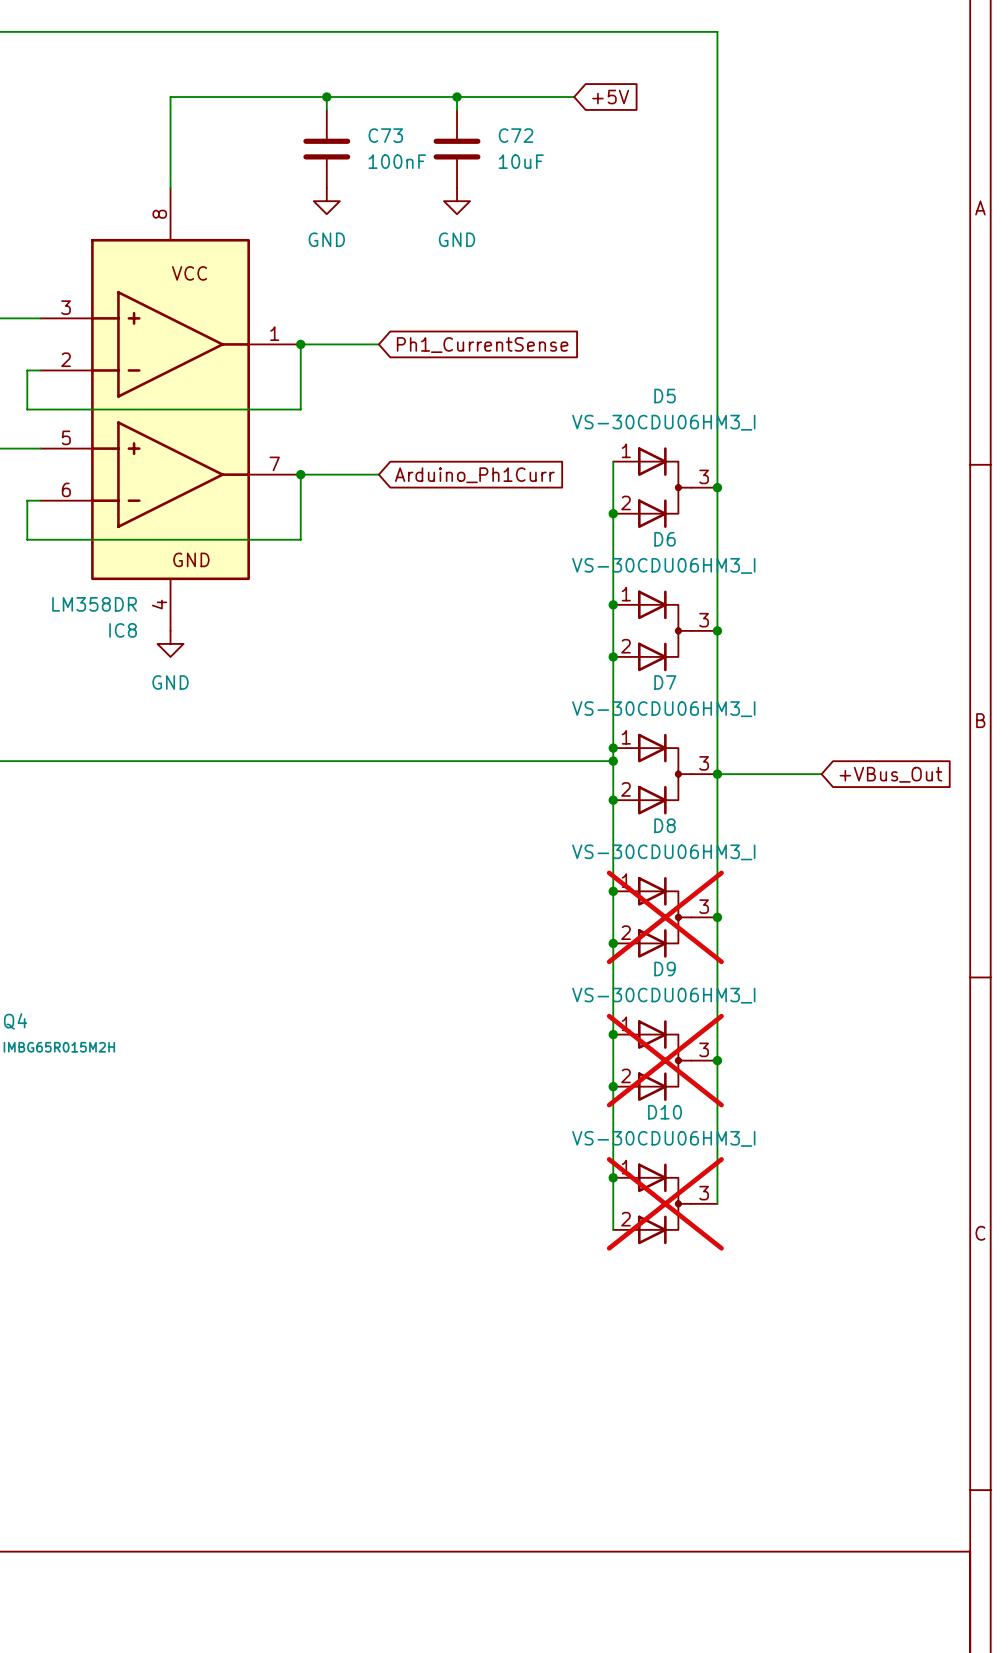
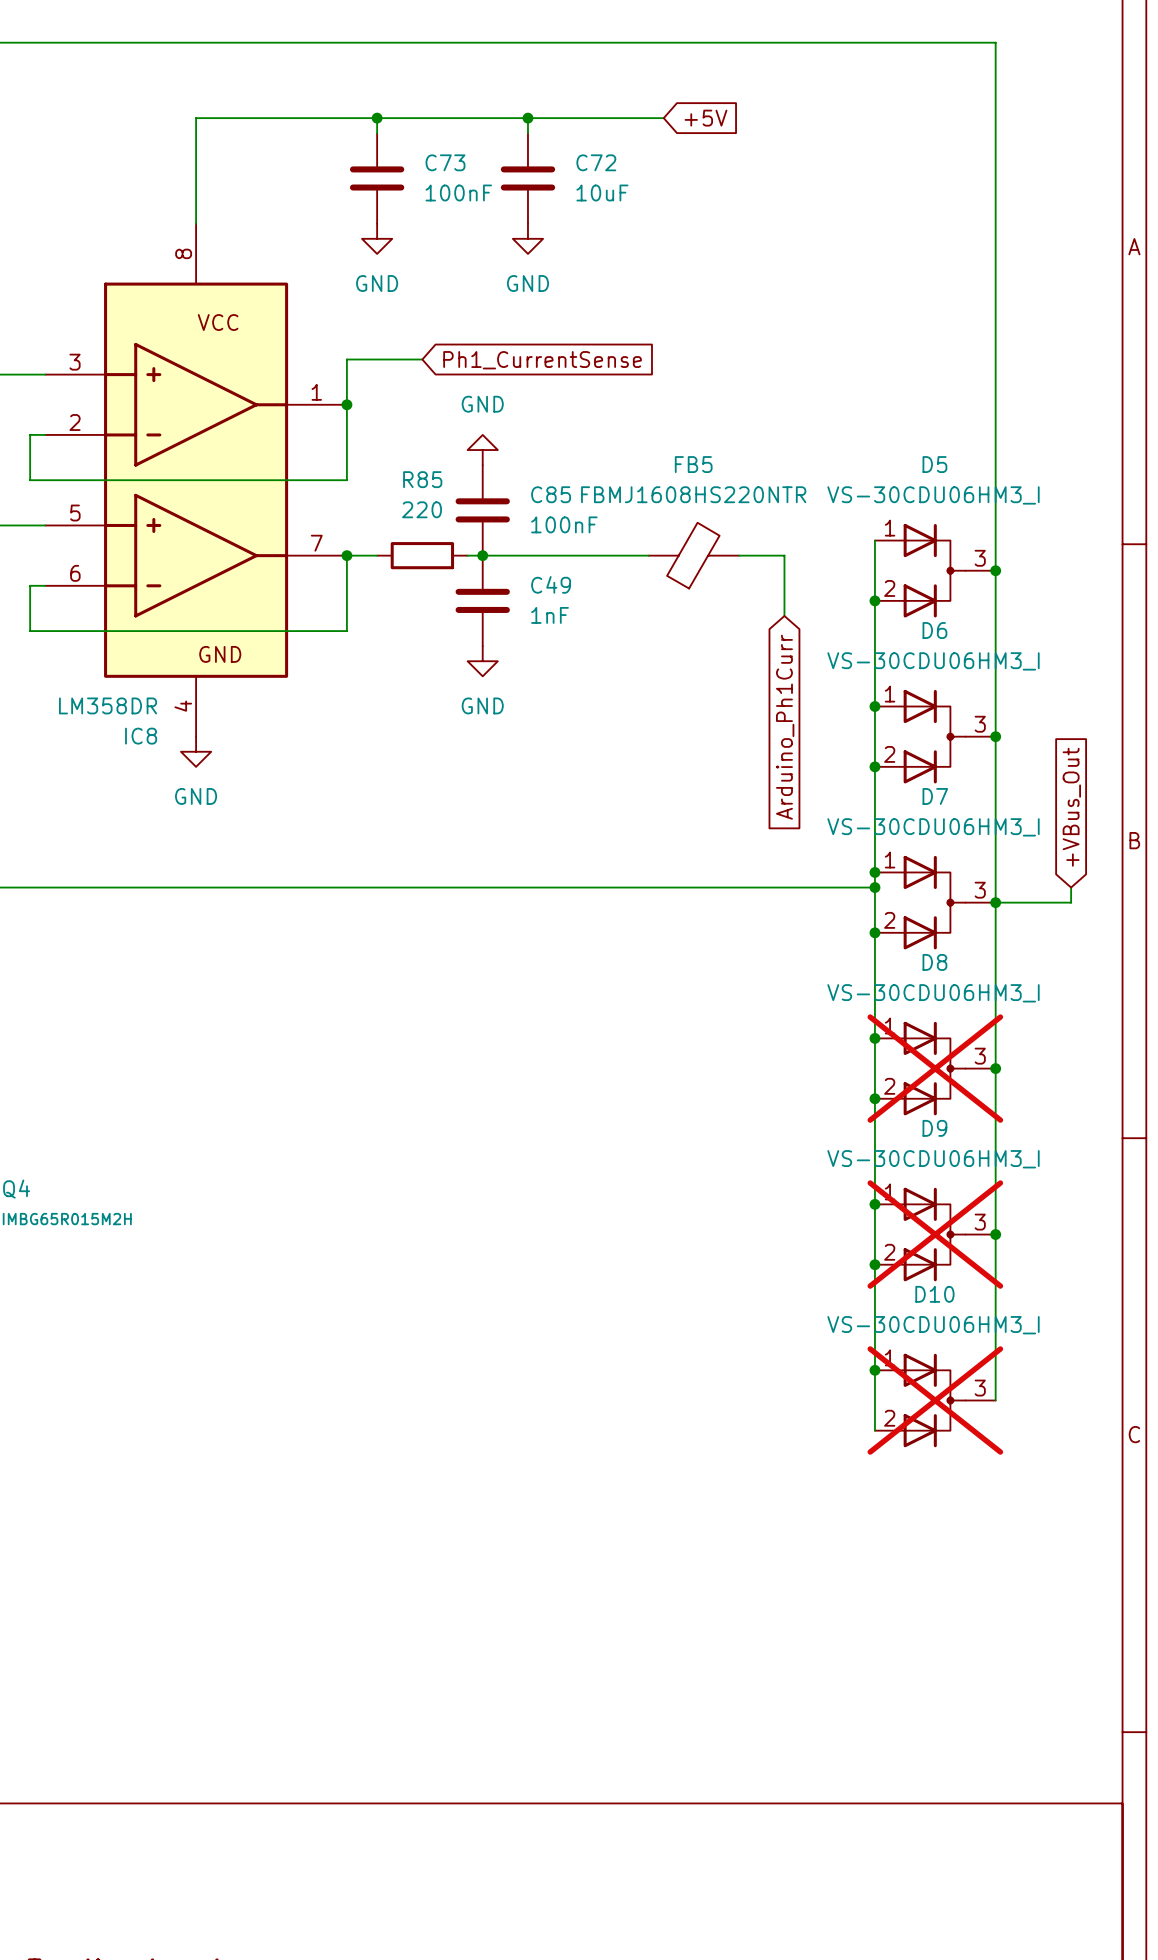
wire: (717, 31) (717, 1203) -> (829, 42) (995, 42) (995, 1400)
wire: (300, 344) (378, 344) -> (346, 404) (346, 359) (422, 359)
global label position: Ph1_CurrentSense (482, 345) -> Ph1_CurrentSense (542, 360)
power symbol: none -> GND (482, 450)
C85: none -> 100nF (482, 510)
wire: (613, 461) (613, 1229) -> (874, 540) (874, 1430)
wire: (326, 474) (378, 474) -> none
R85: none -> 220 (422, 555)
wire: none -> (467, 555) (648, 555)
junction: none -> (482, 555)
FB5: none -> FBMJ1608HS220NTR (693, 555)
wire: none -> (739, 555) (784, 555) (784, 615)
global label: Arduino_Ph1Curr (474, 475) -> none
D5 position: (665, 487) -> (935, 570)
junction position: (717, 487) -> (874, 600)
junction: none -> (995, 570)
C49: none -> 1nF (482, 600)
junction: (613, 513) -> none
power symbol: none -> GND (482, 661)
junction: (613, 604) -> none
junction: none -> (874, 706)
global label: none -> Arduino_Ph1Curr (785, 727)
D6 position: (665, 630) -> (935, 736)
junction: (717, 630) -> none
junction: none -> (995, 736)
junction: (613, 656) -> none
junction: none -> (874, 766)
junction: (613, 748) -> none
junction: none -> (874, 872)
wire: none -> (709, 887) (874, 887)
junction: (613, 761) -> none
junction: none -> (874, 887)
wire: none -> (1071, 887) (1071, 902) (995, 902)
D7 position: (665, 774) -> (935, 902)
wire: (717, 774) (821, 774) -> none
junction: (717, 774) -> none
junction: none -> (995, 902)
global label rotation: 0° (890, 774) -> 90° counterclockwise (1071, 807)
junction: (613, 800) -> none
junction: none -> (874, 932)
junction: (613, 891) -> none
junction: none -> (874, 1038)
D8 position: (665, 917) -> (935, 1068)
junction: (717, 917) -> none
junction: none -> (995, 1068)
junction: (613, 943) -> none
junction: none -> (874, 1098)
junction: (613, 1034) -> none
junction: none -> (874, 1204)
D9 position: (665, 1060) -> (935, 1234)
junction: (717, 1060) -> none
junction: none -> (995, 1234)
junction: (613, 1086) -> none
junction: none -> (874, 1264)
junction: (613, 1177) -> none
junction: none -> (874, 1370)
D10 position: (665, 1203) -> (935, 1400)

